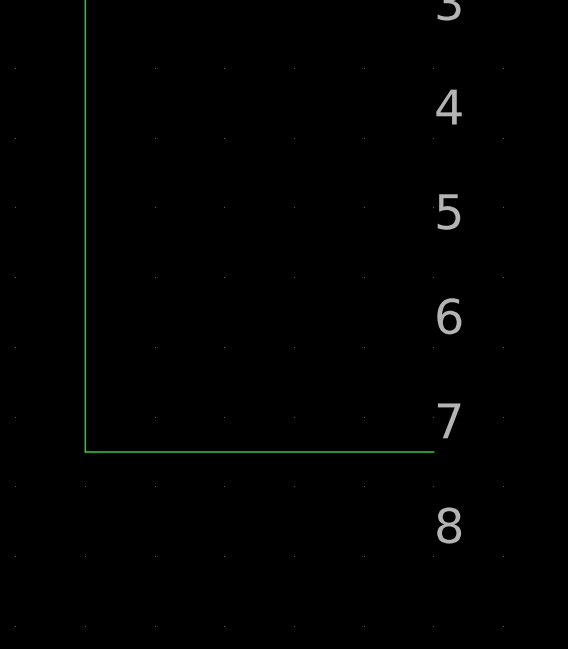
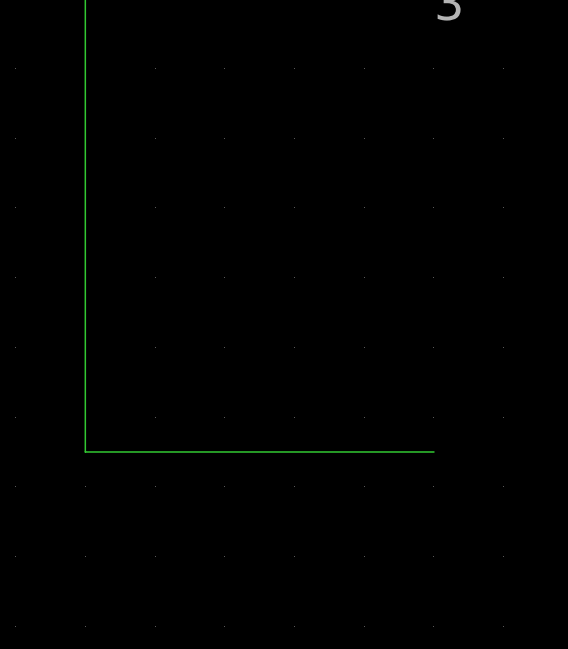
label: 4 (449, 107) -> none
label: 5 (448, 212) -> none
label: 6 (449, 316) -> none
label: 7 (449, 420) -> none
label: 8 (449, 525) -> none

